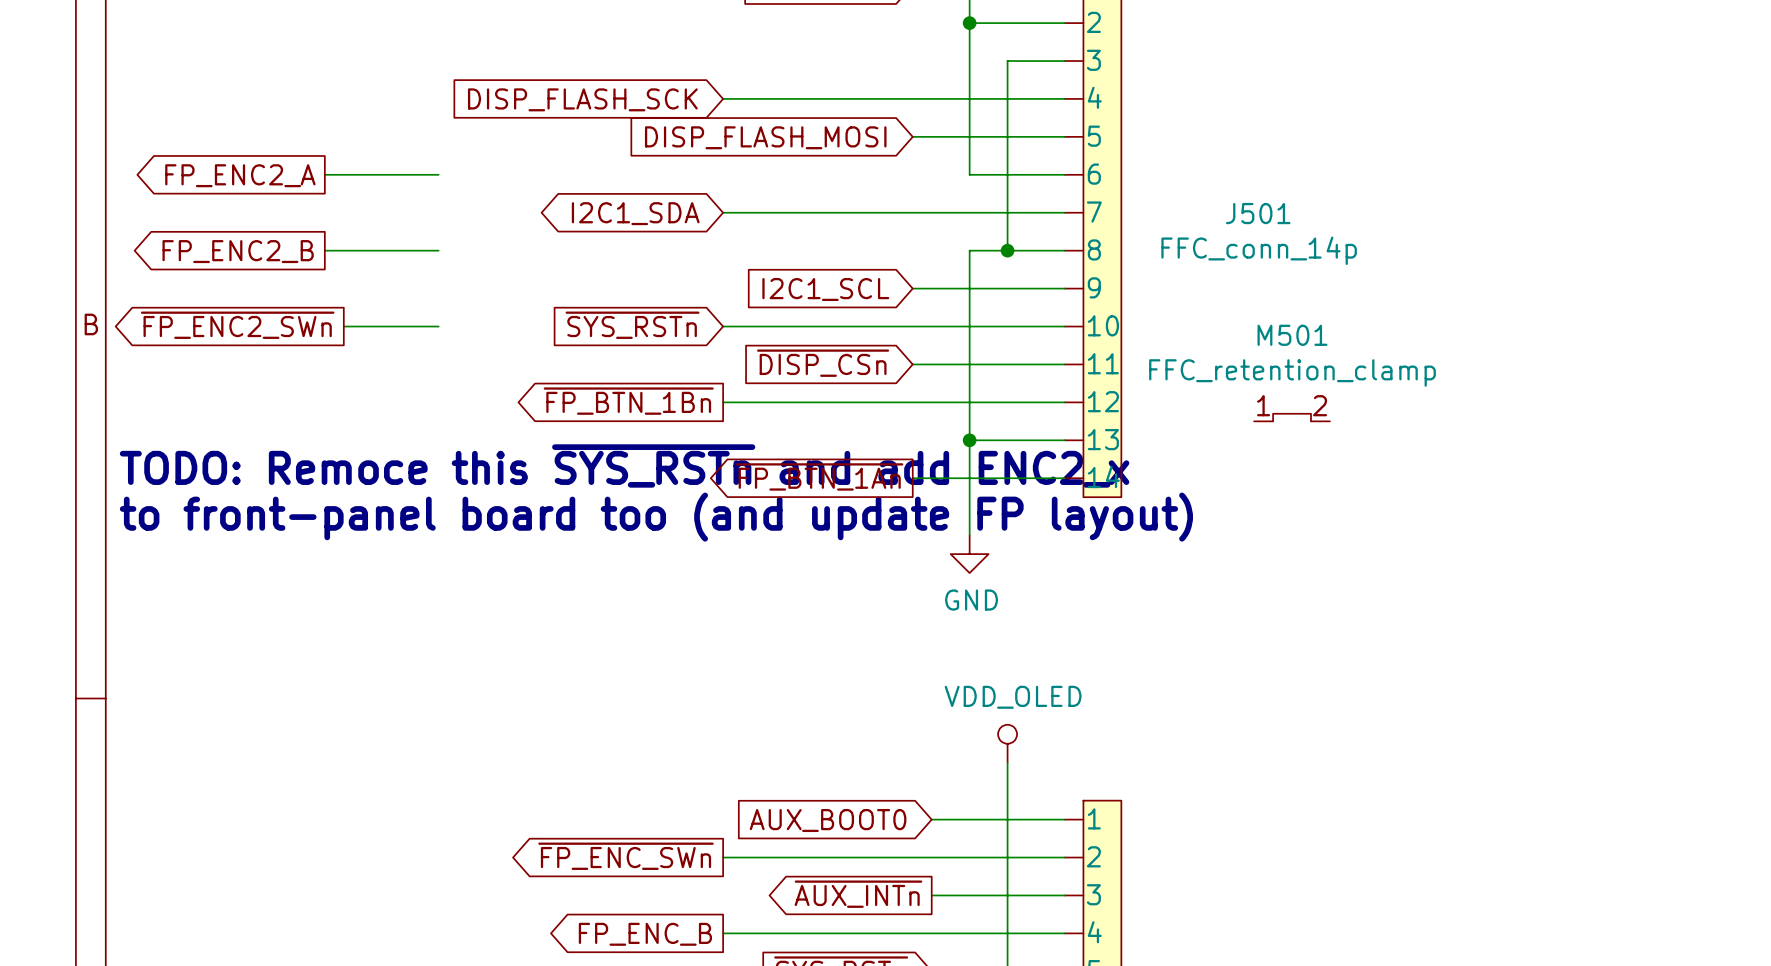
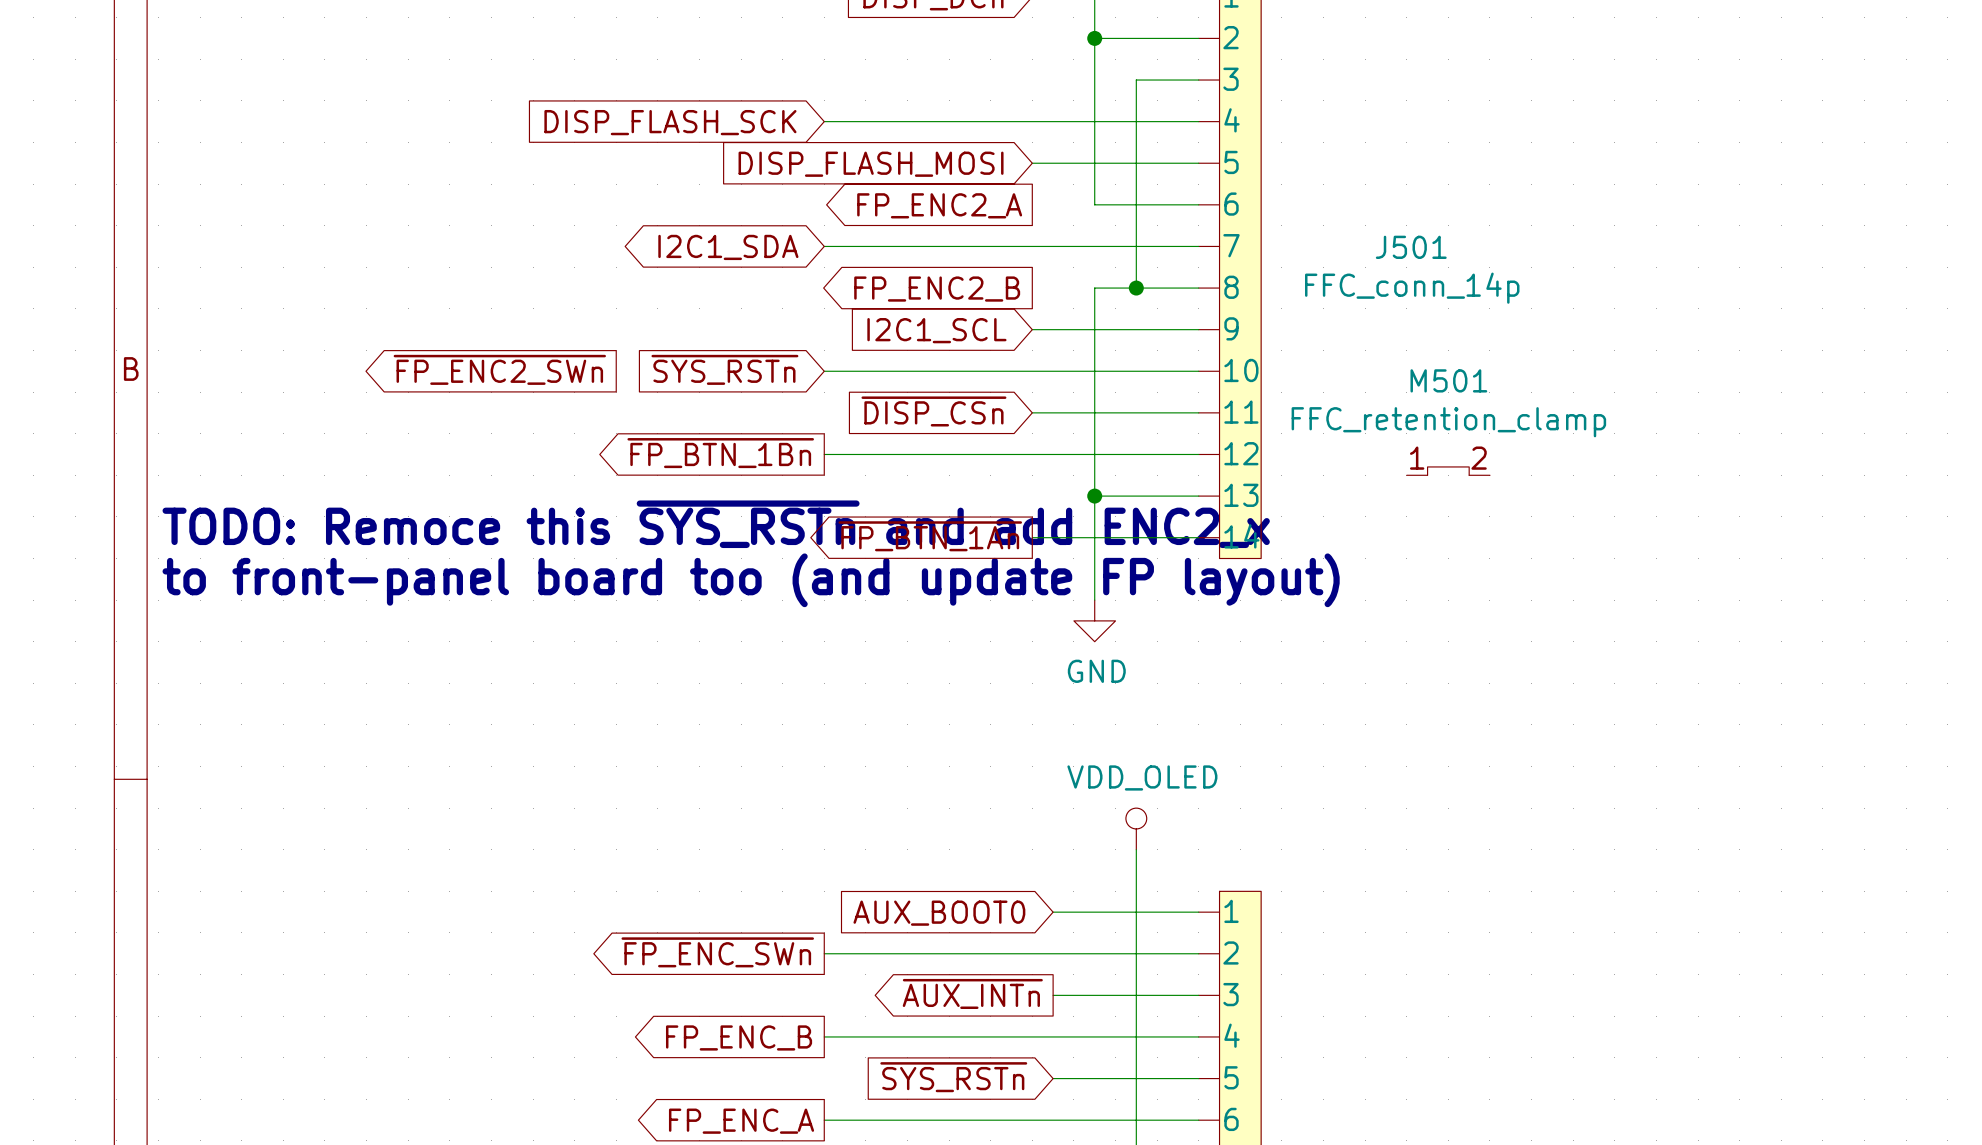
wire: (324, 174) (438, 174) -> none
global label: FP_ENC2_A (240, 175) -> none
global label: none -> FP_ENC2_A (939, 205)
wire: (324, 250) (438, 250) -> none
global label: FP_ENC2_B (238, 251) -> none
global label: none -> FP_ENC2_B (937, 289)
global label position: ~{FP_ENC2_SWn} (237, 325) -> ~{FP_ENC2_SWn} (499, 369)
wire: (343, 326) (438, 326) -> none

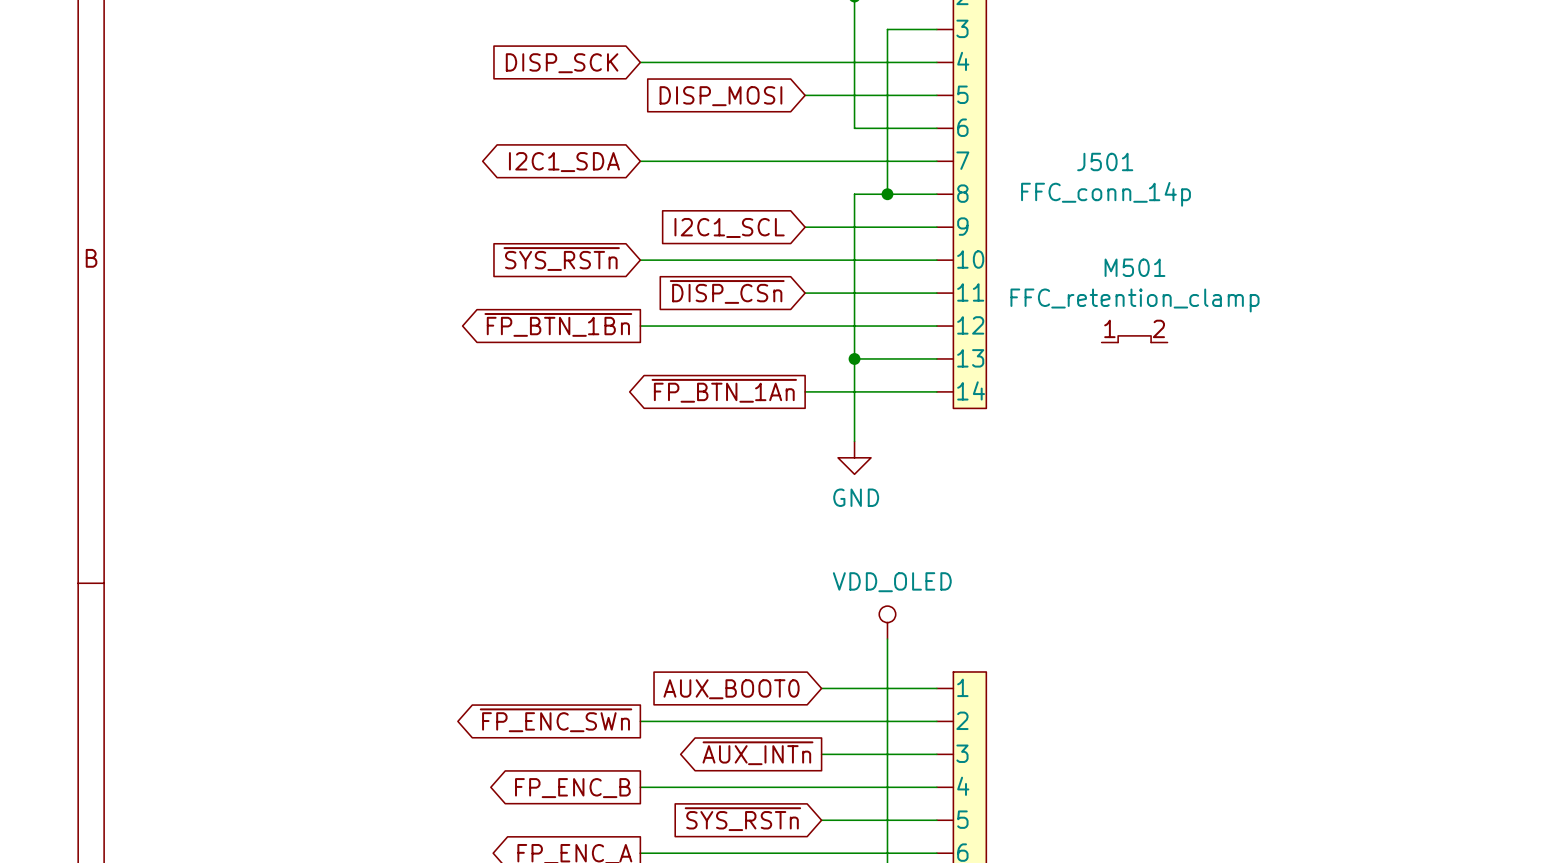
global label: DISP_FLASH_SCK (670, 122) -> DISP_SCK (562, 63)
global label: DISP_FLASH_MOSI (871, 164) -> DISP_MOSI (720, 96)
global label: FP_ENC2_A (939, 205) -> none
global label: FP_ENC2_B (937, 289) -> none
global label: ~{FP_ENC2_SWn} (499, 369) -> none
text: TODO: Remoce this ~{SYS_RSTn} and add ENC2_x (716, 524) -> none
text: to front-panel board too (and update FP layout) (751, 580) -> none

